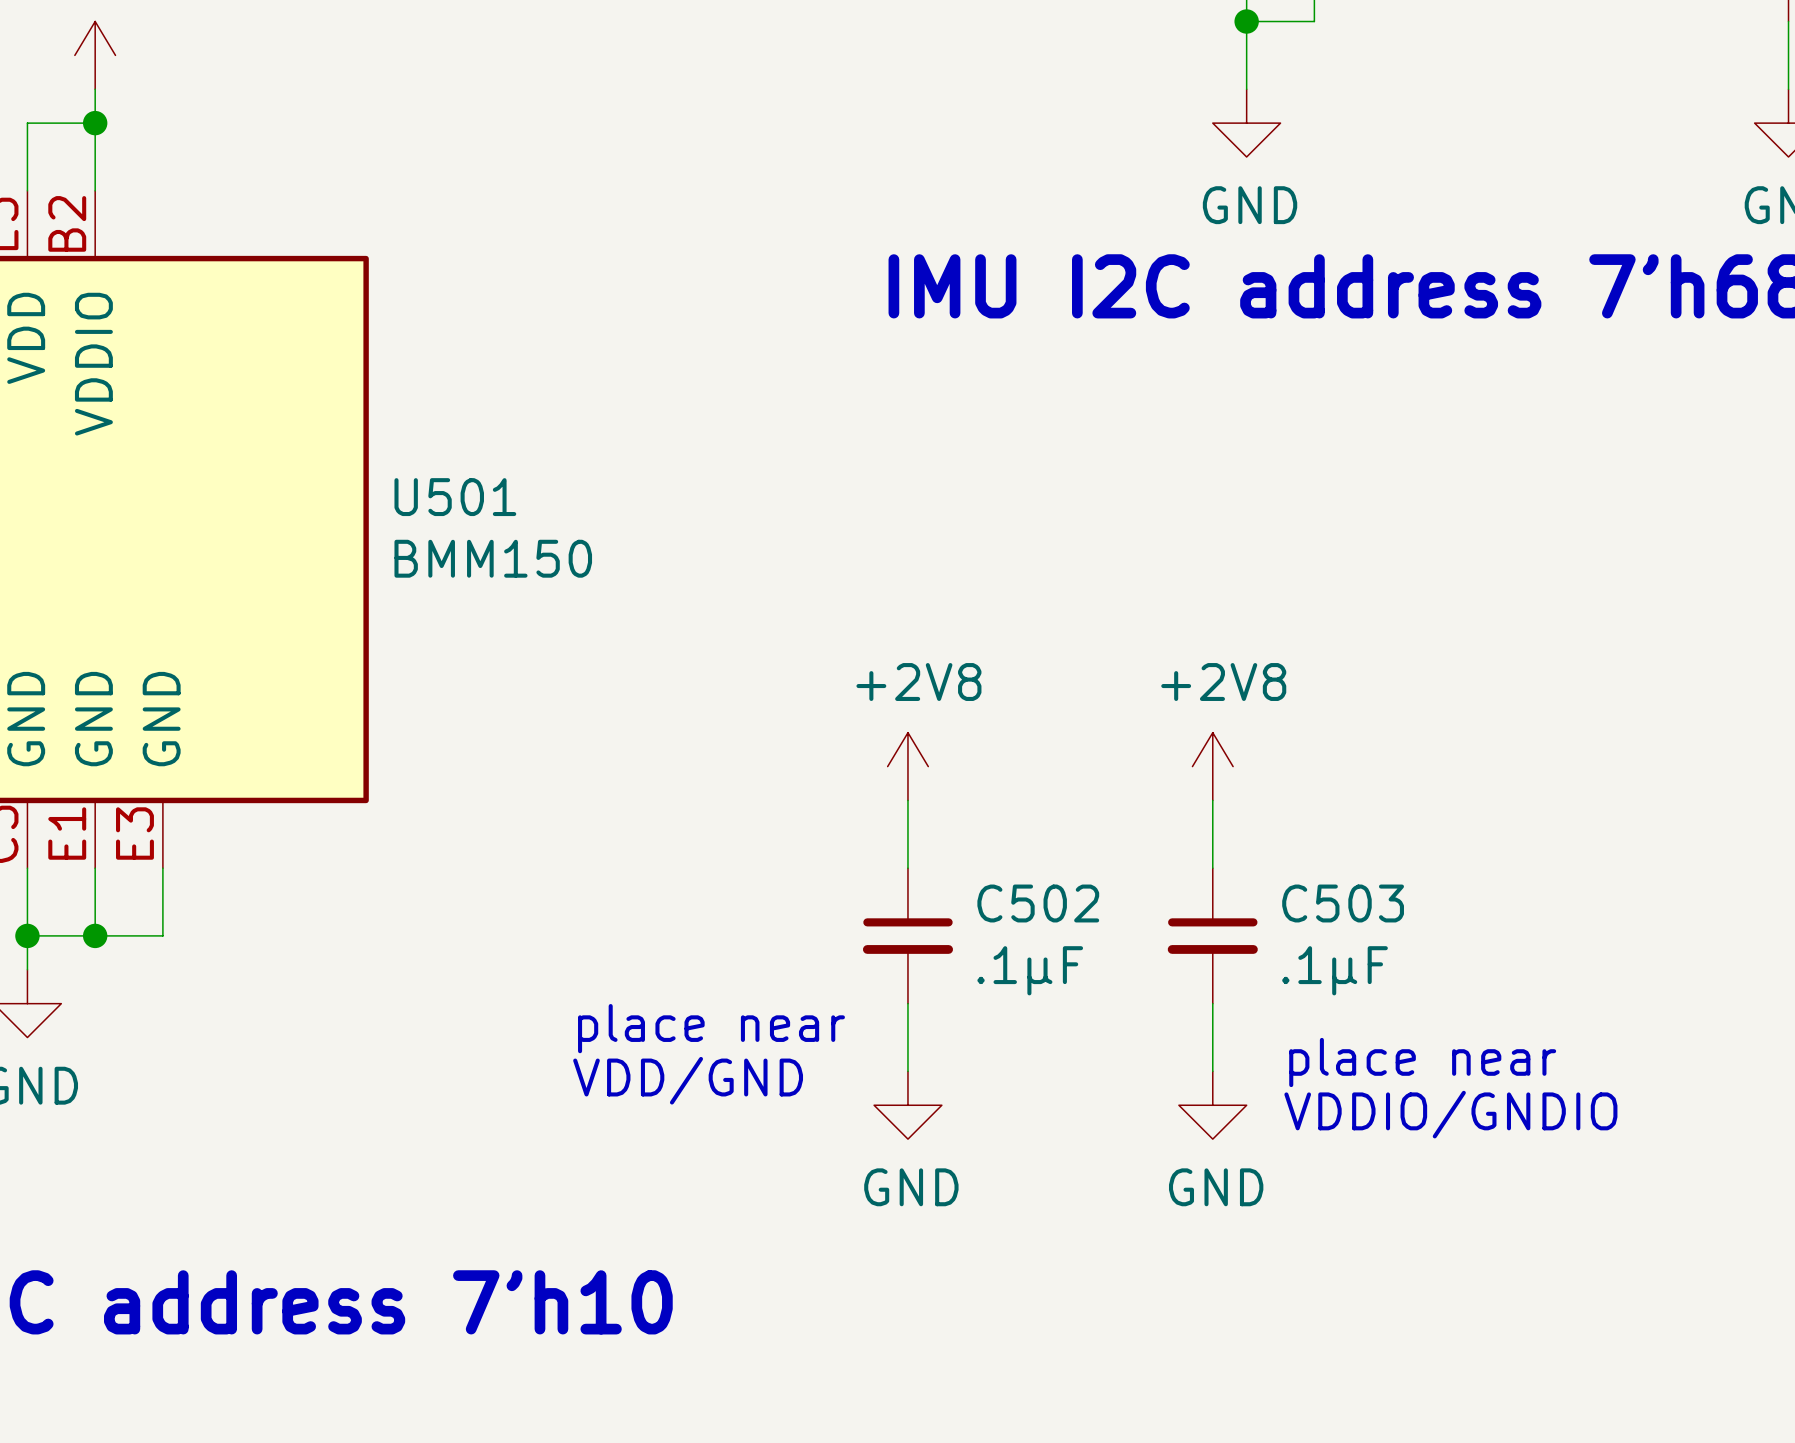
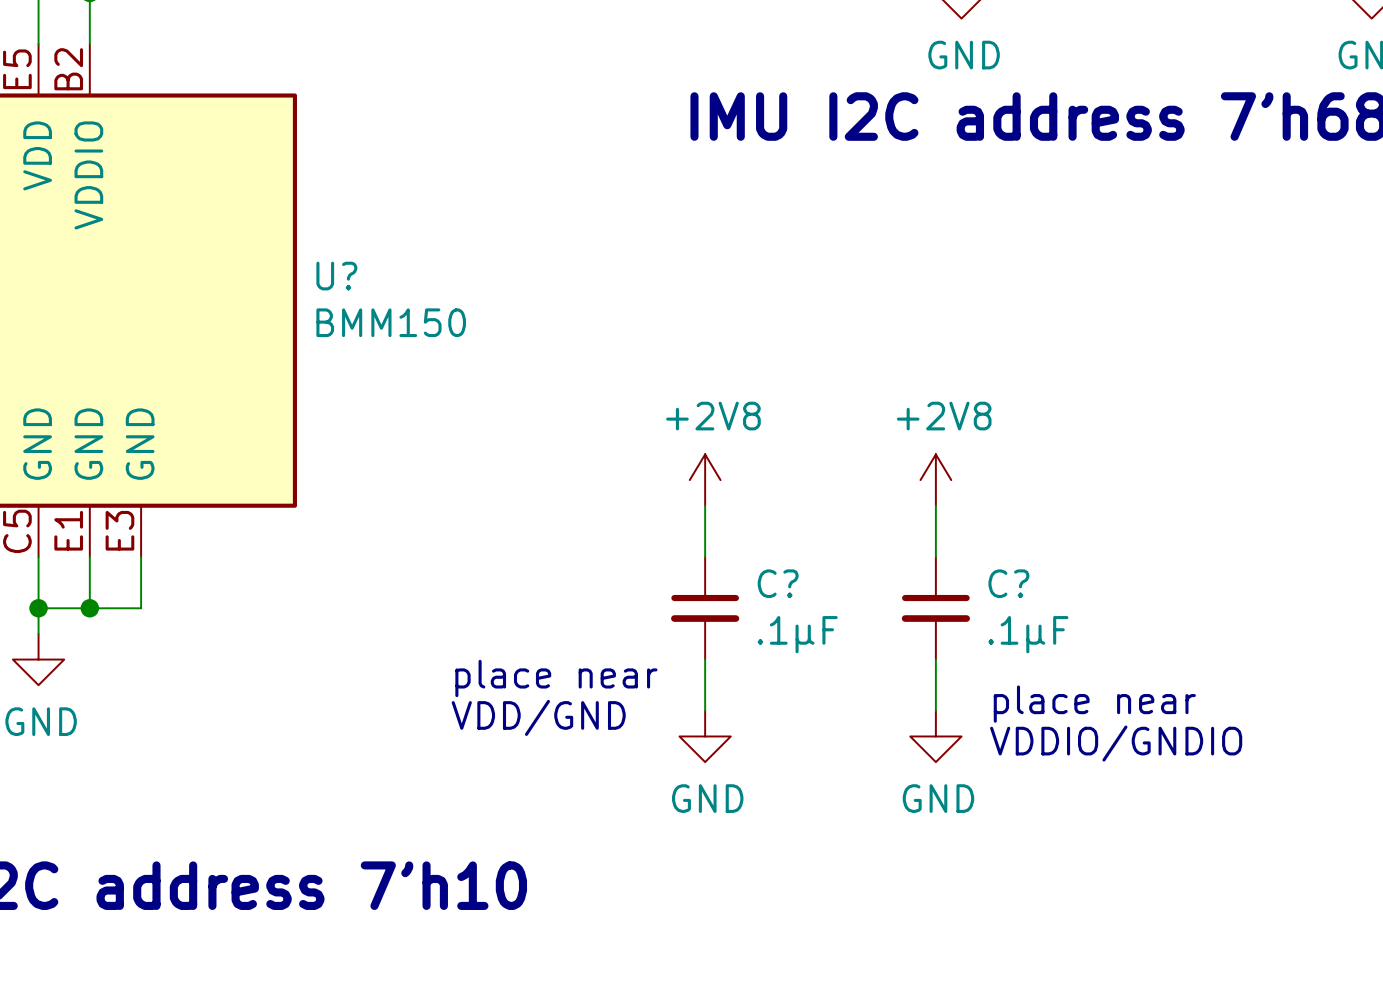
U501 name: U501 (455, 497) -> U? (336, 276)
C502 name: C502 (1038, 903) -> C? (778, 583)
C503 name: C503 (1343, 903) -> C? (1008, 583)

